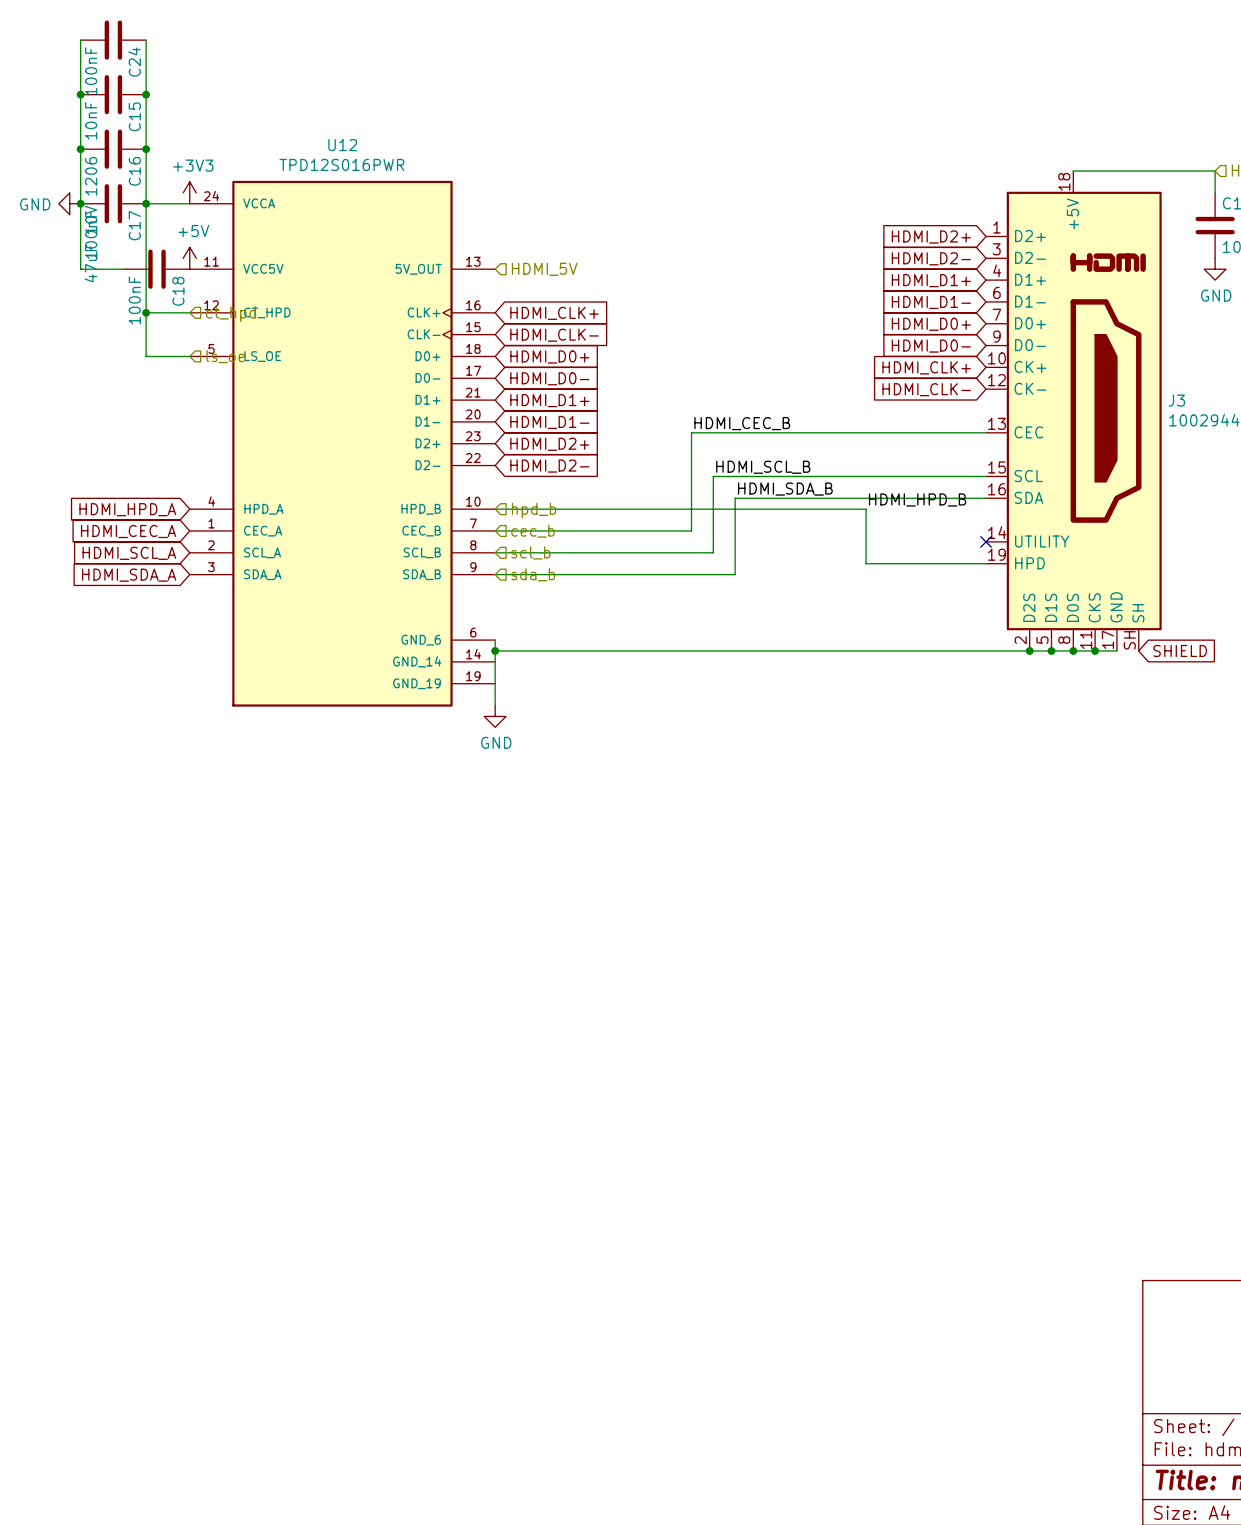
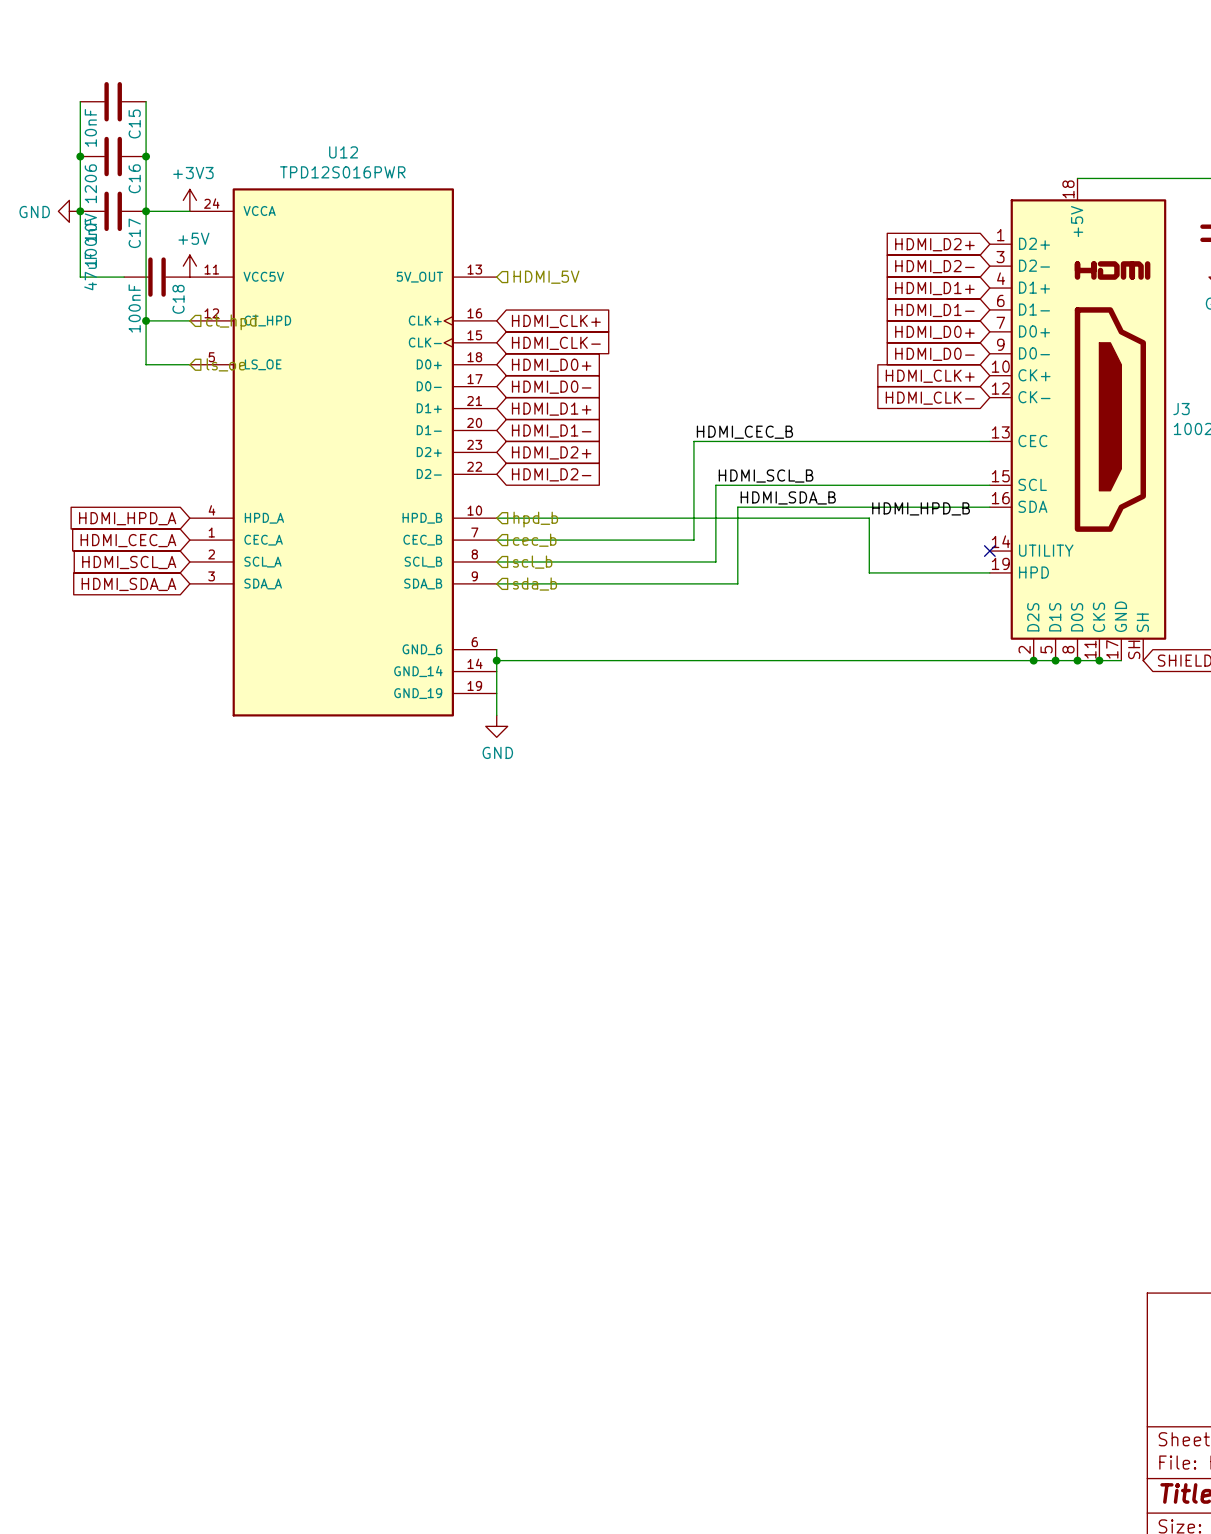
wire: (80, 40) (80, 94) -> none
C24: 100nF (113, 40) -> none
wire: (146, 40) (146, 94) -> none
junction: (80, 94) -> none
junction: (146, 94) -> none

